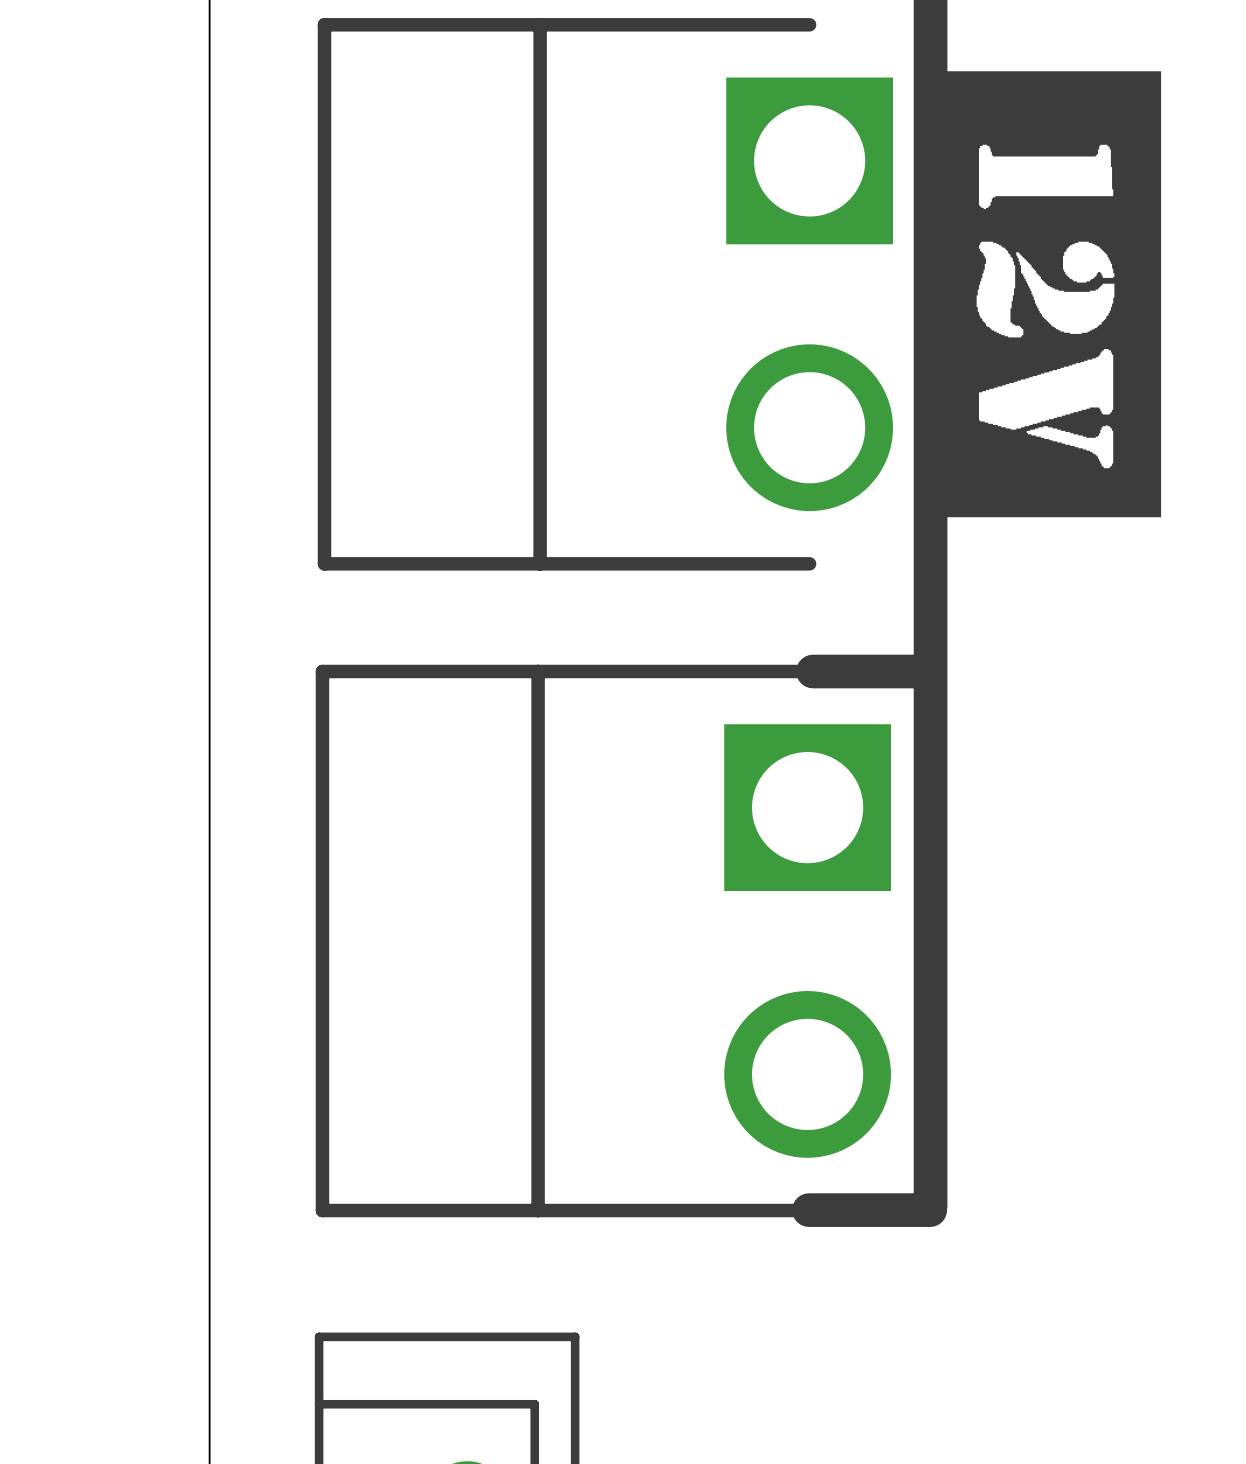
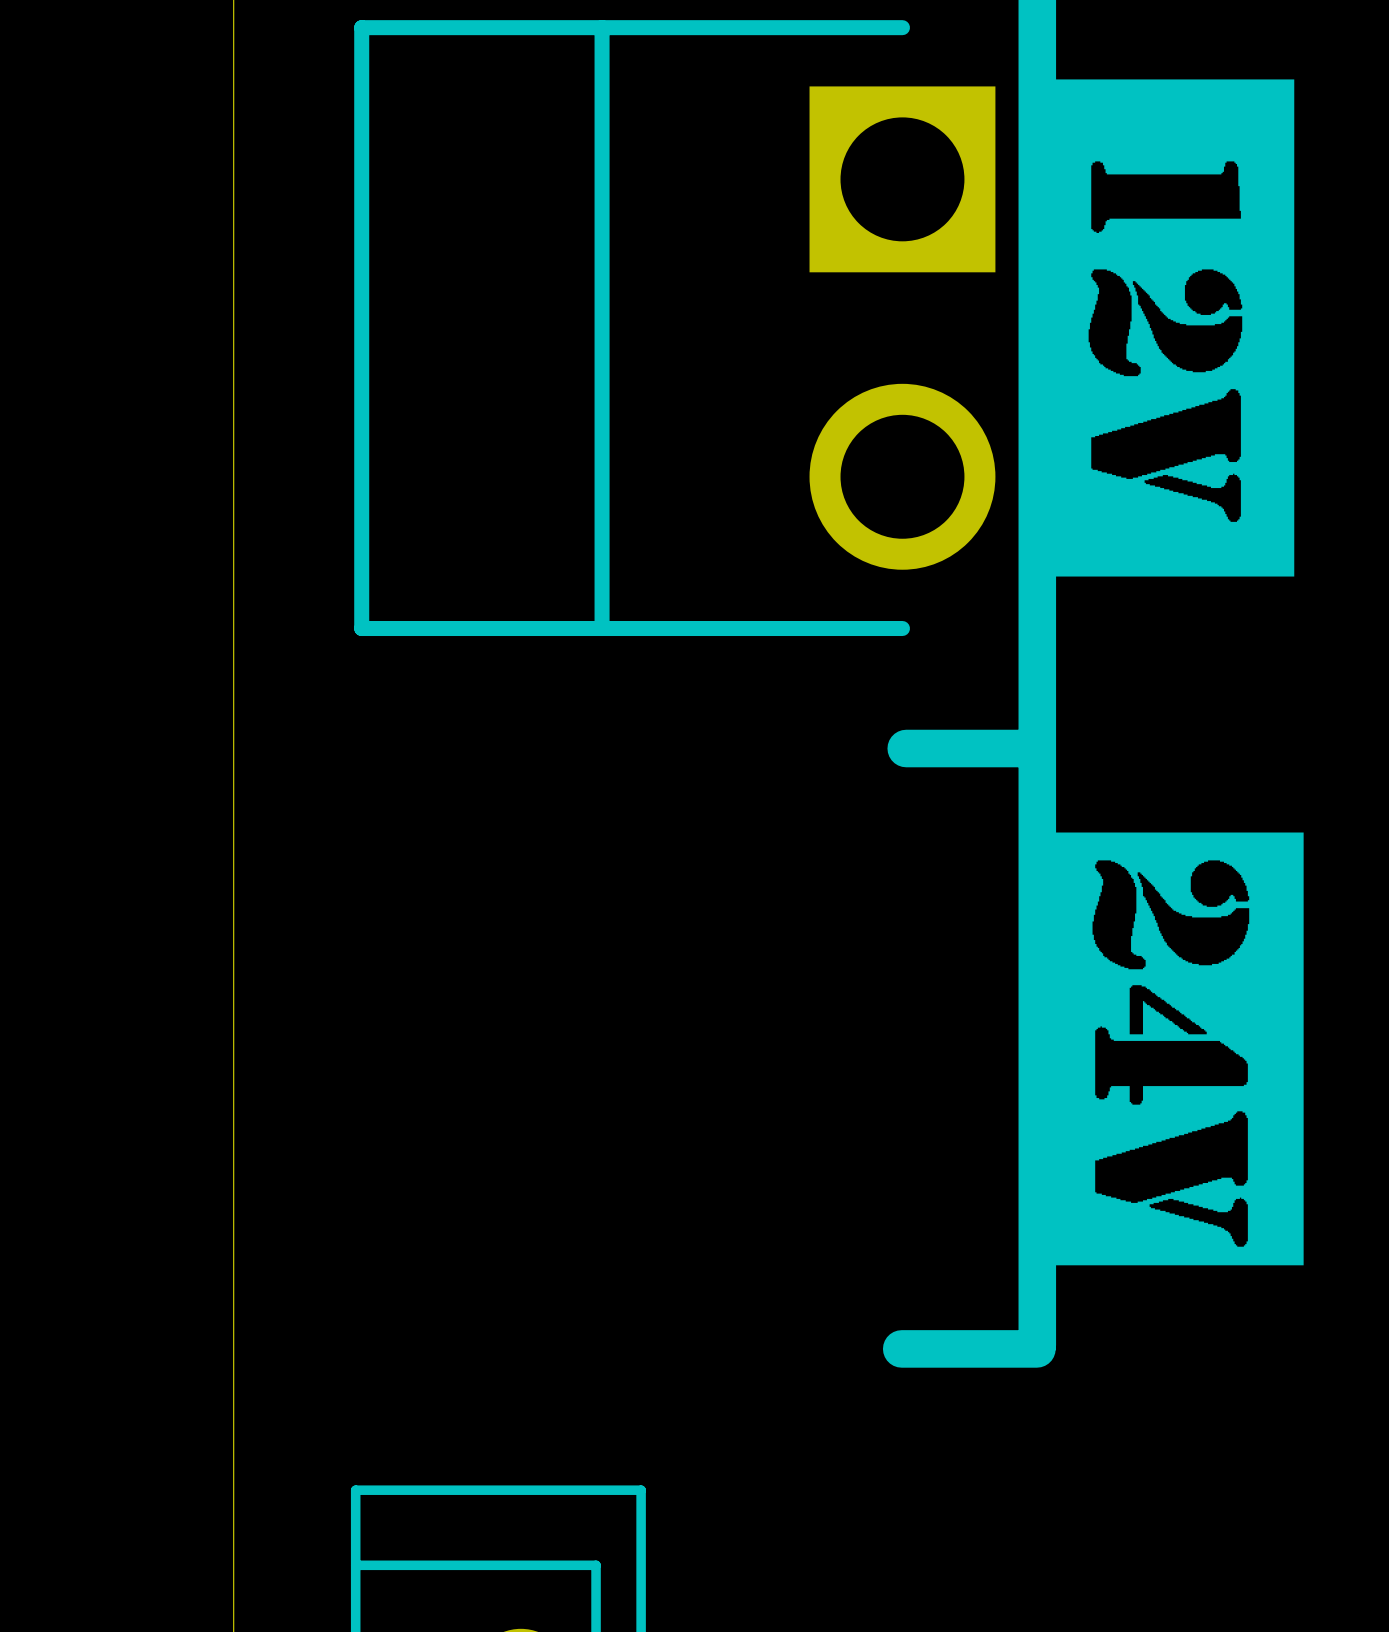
drawing: none -> [1040, 832, 1304, 1266]
part: (603, 941) -> none

